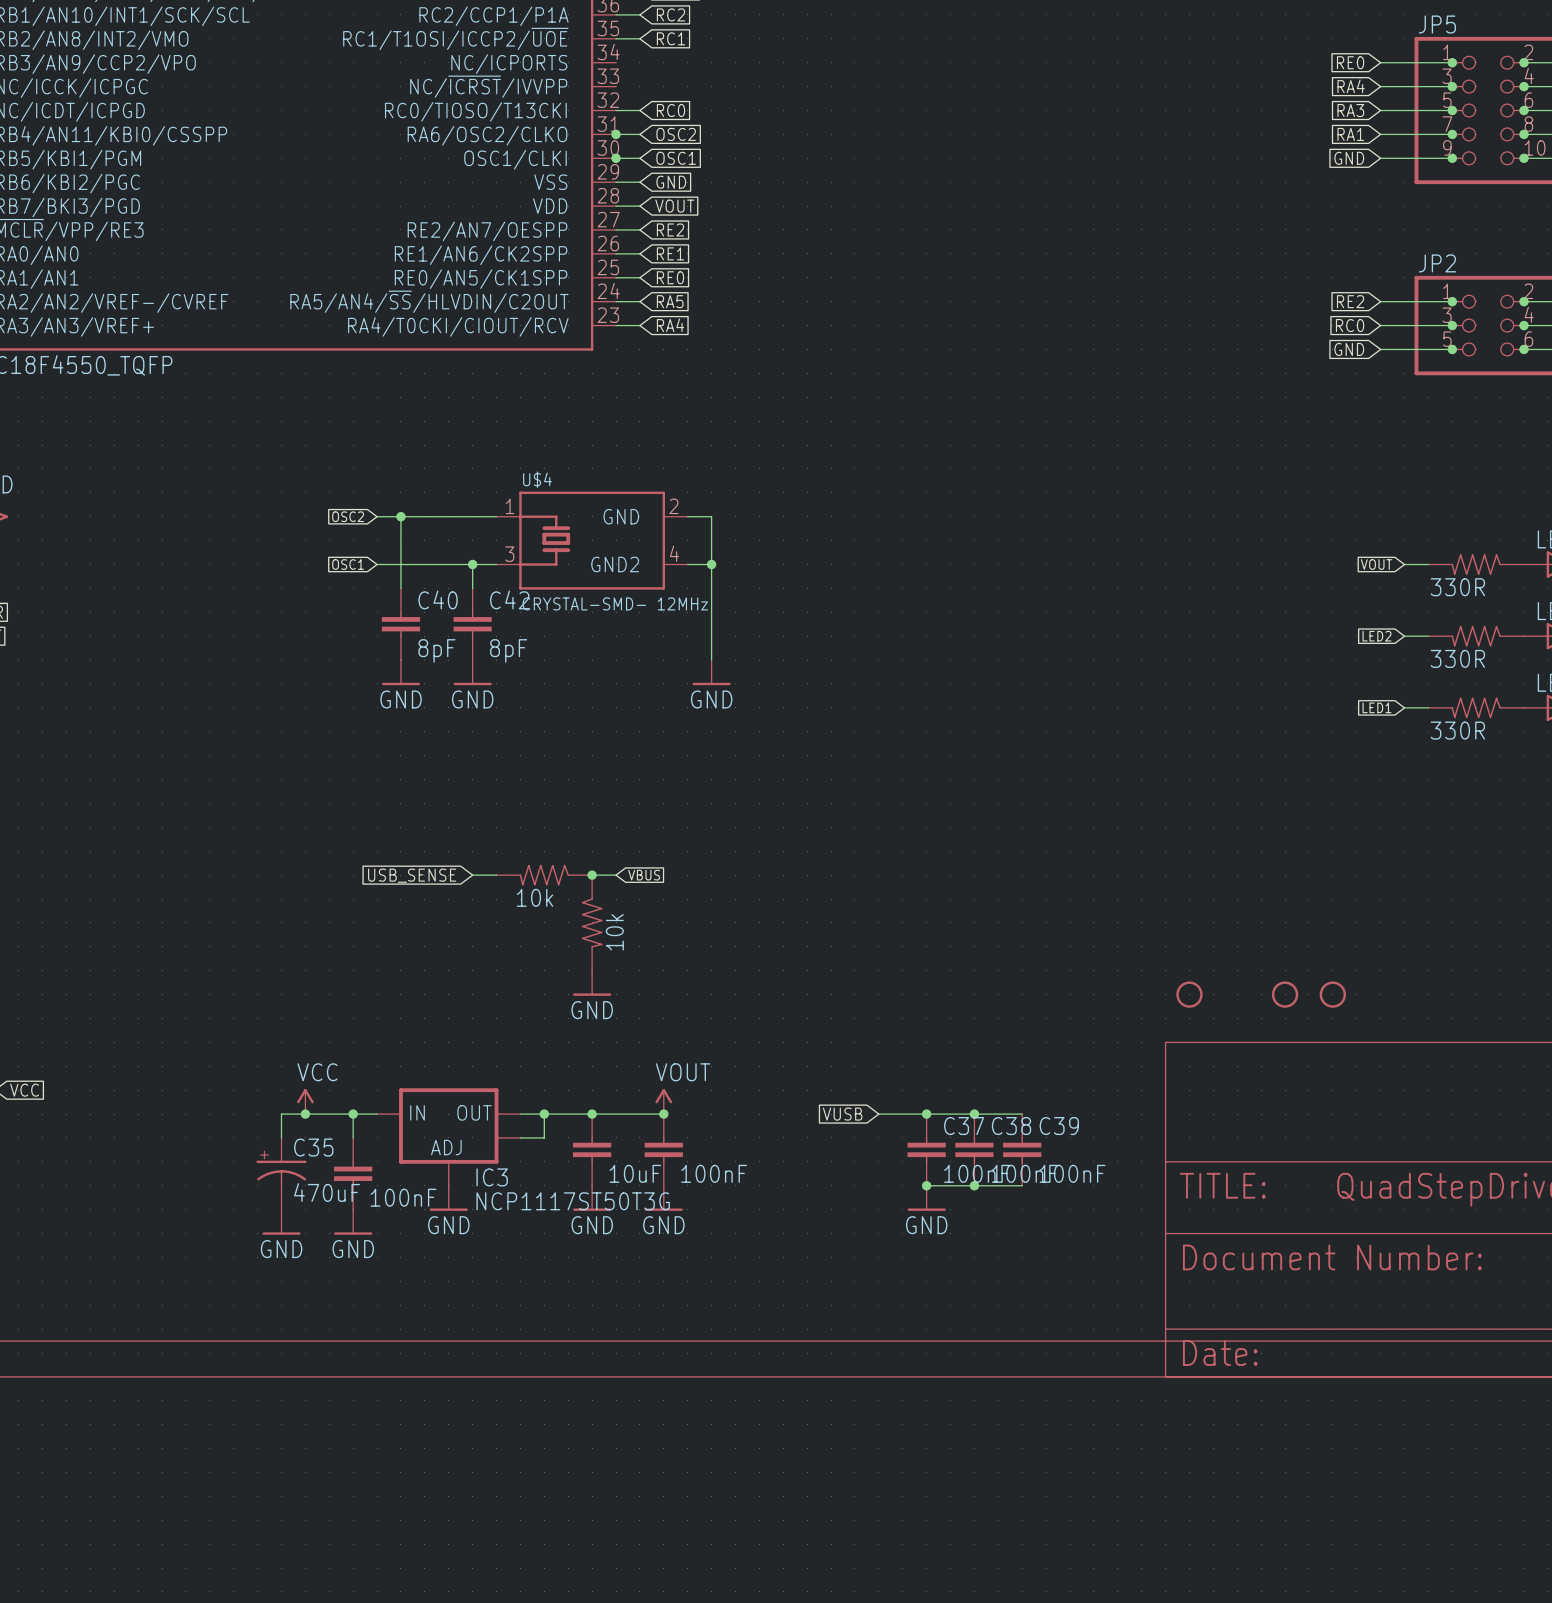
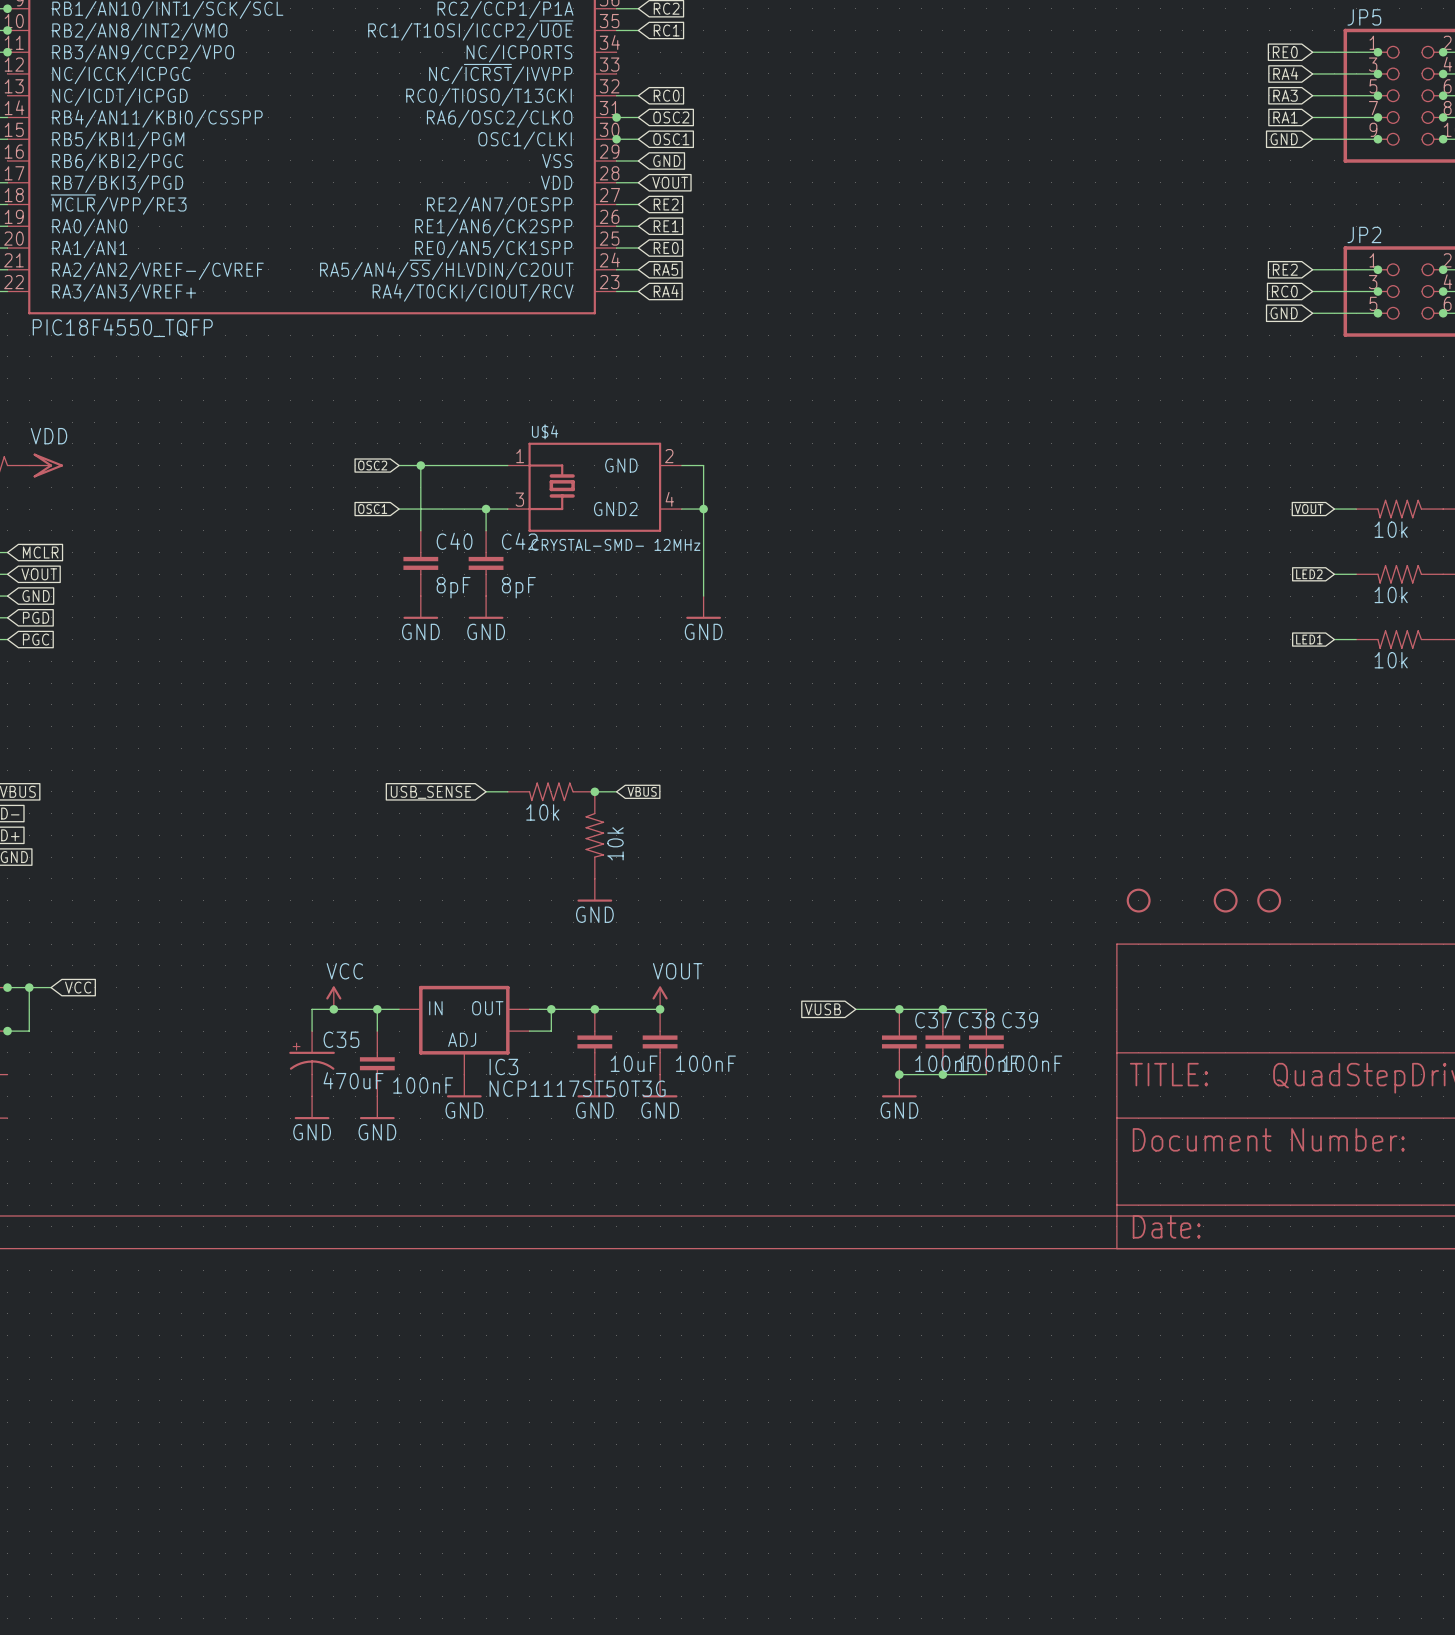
part value: 330R (1457, 587) -> 10k (1391, 529)
part value: 330R (1457, 658) -> 10k (1391, 594)
part value: 330R (1457, 730) -> 10k (1391, 660)

